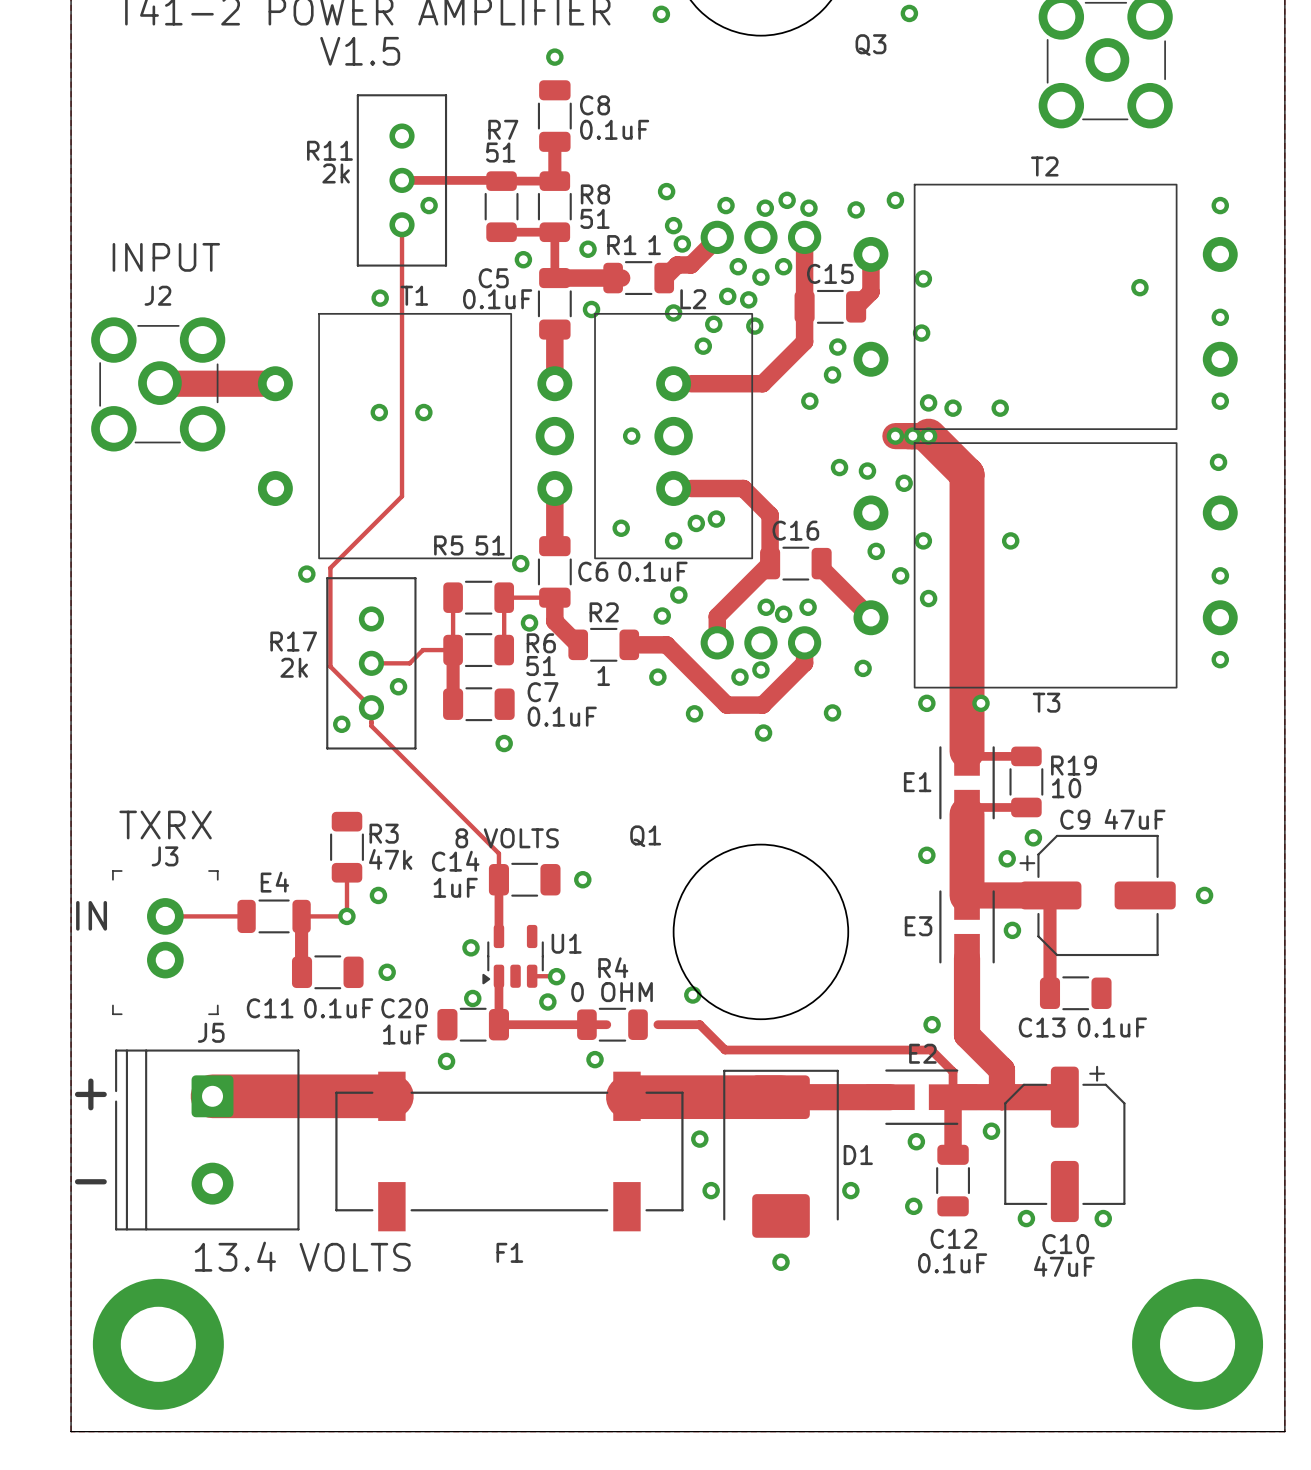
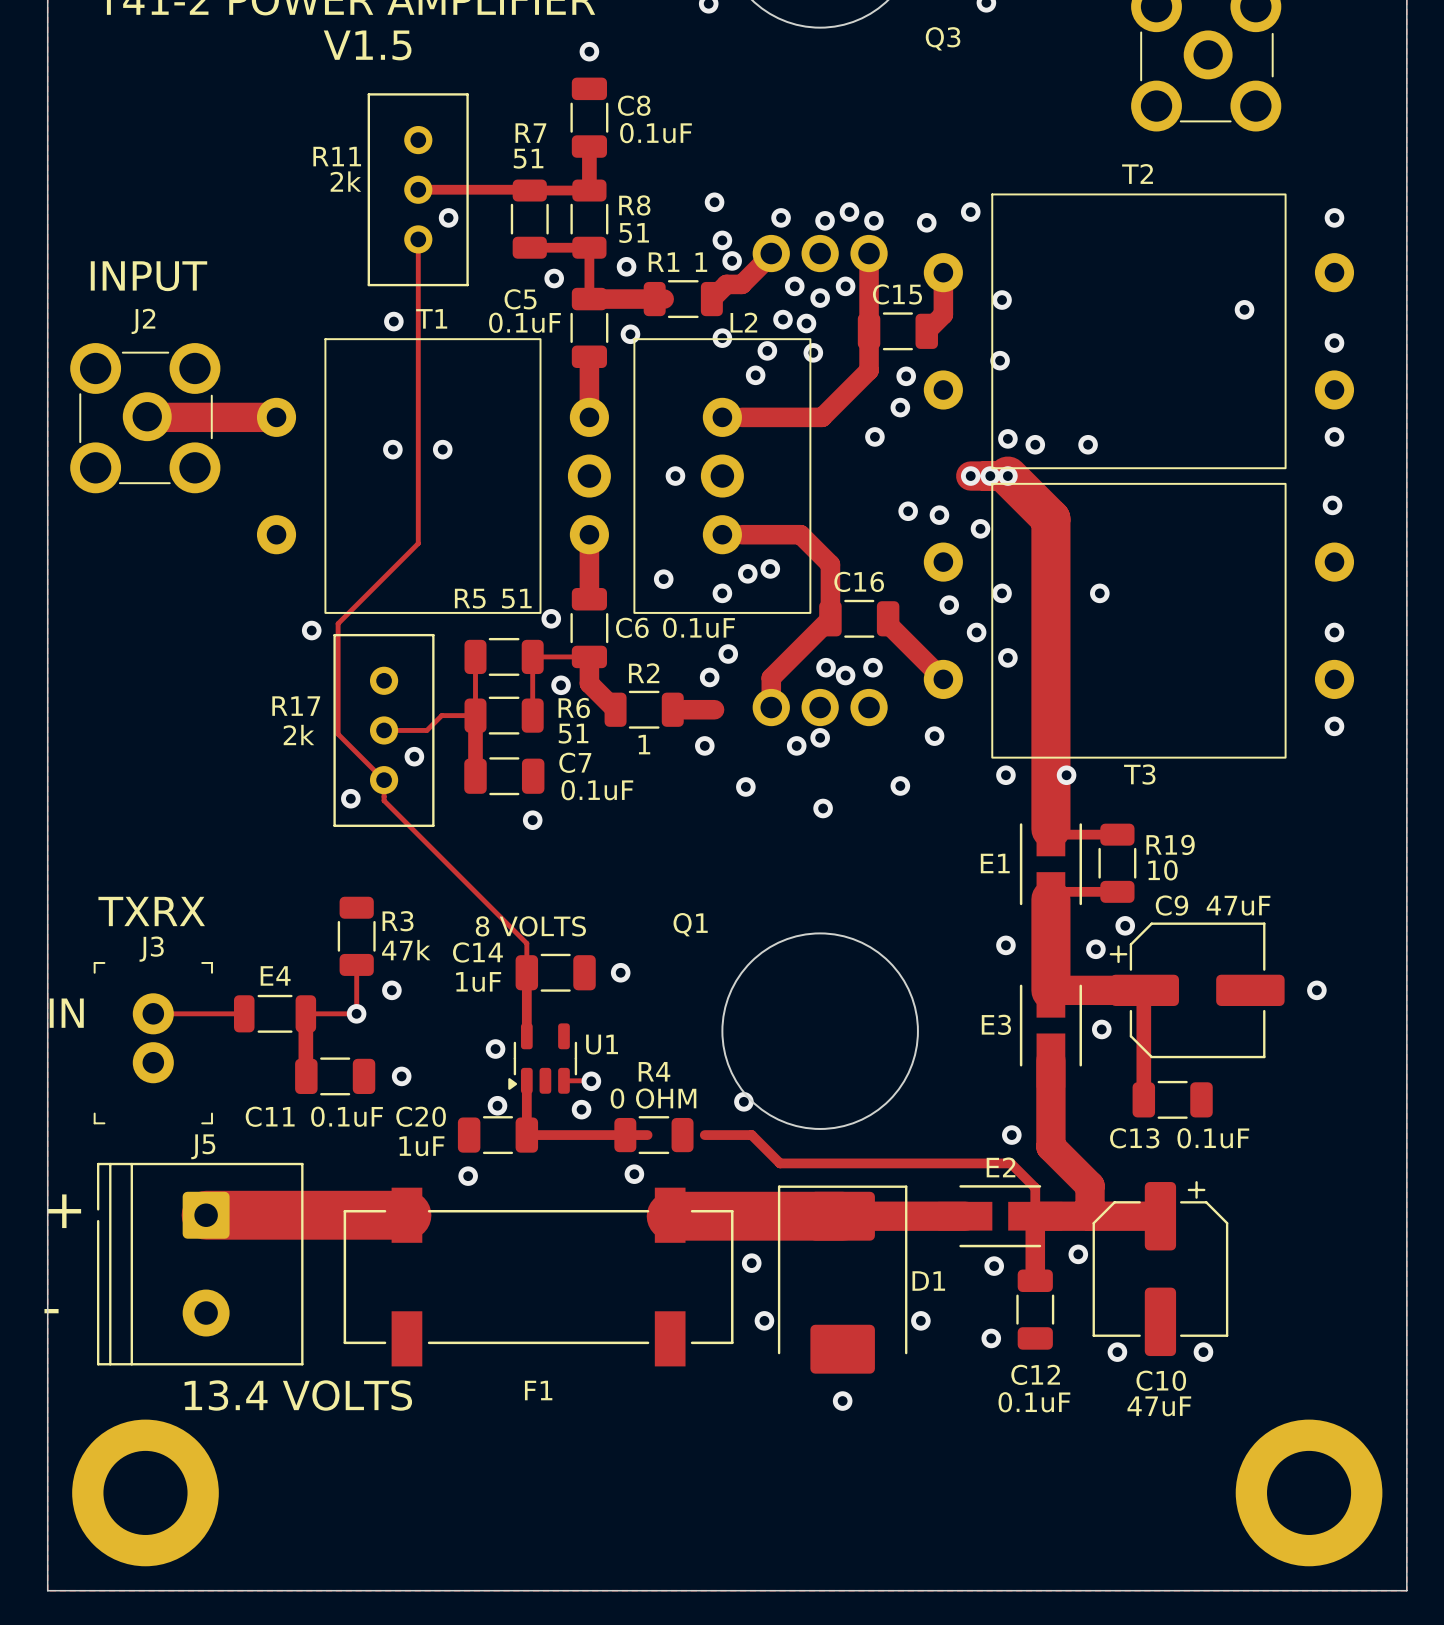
track: (804, 642) (804, 663) (762, 705) (726, 705) (666, 644) -> none

